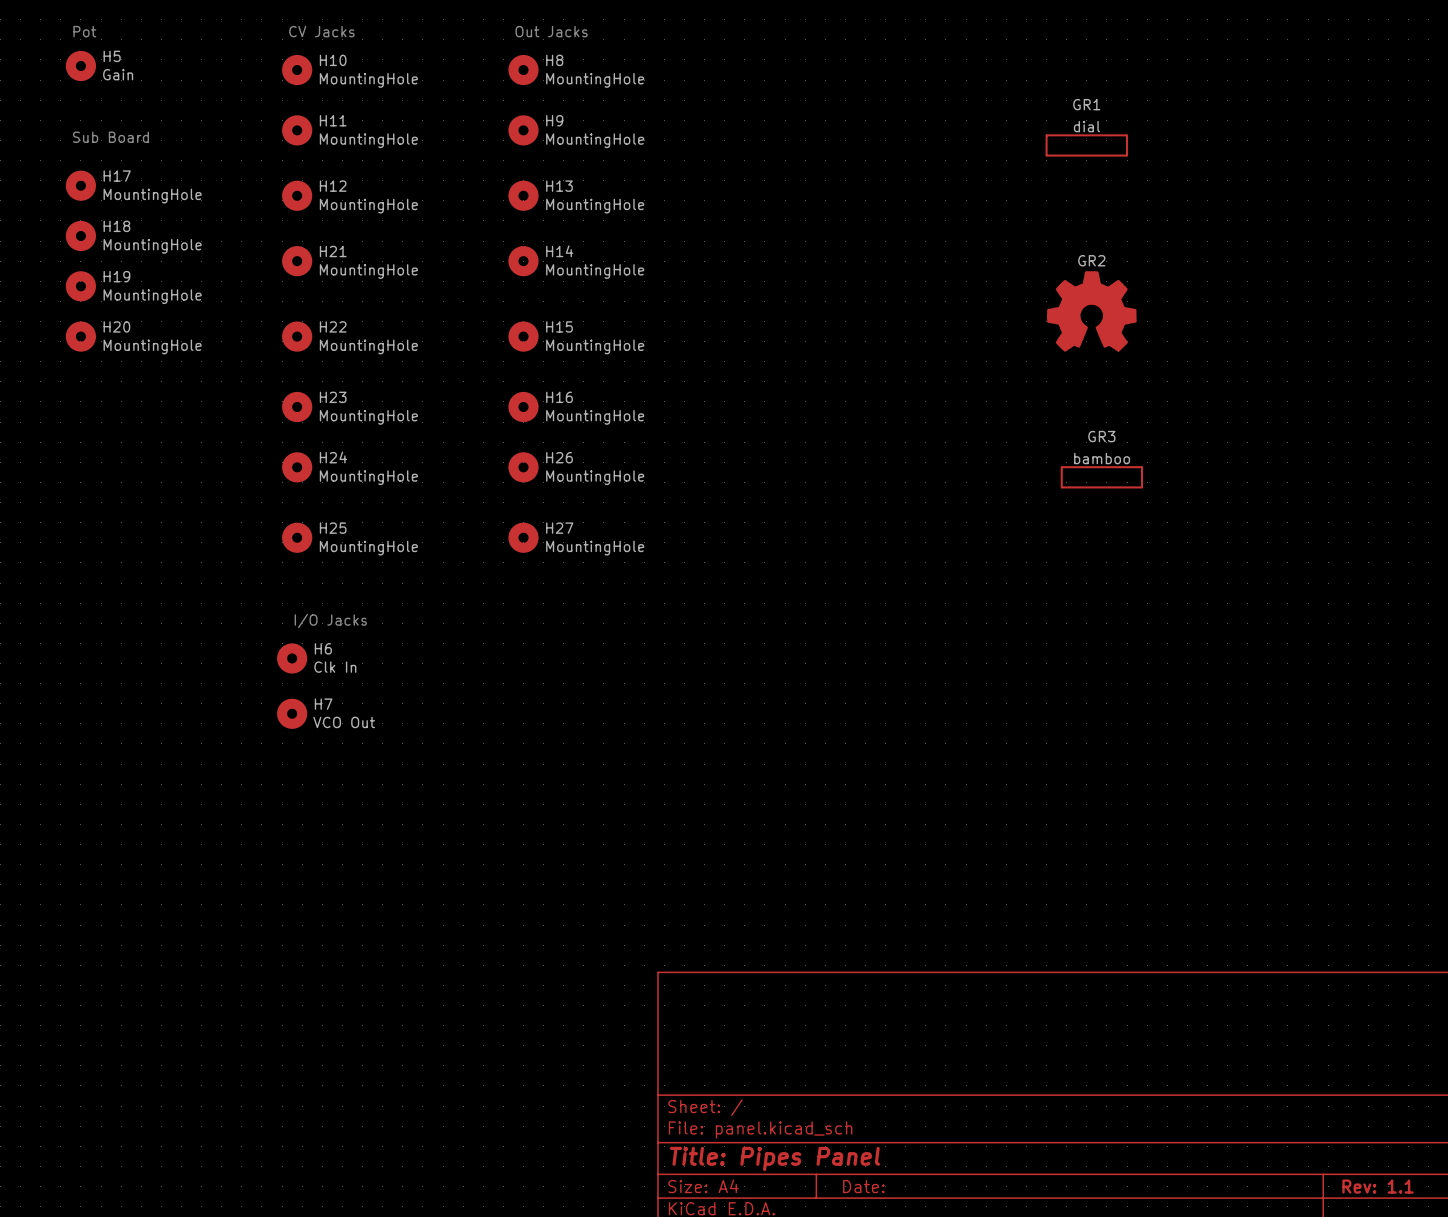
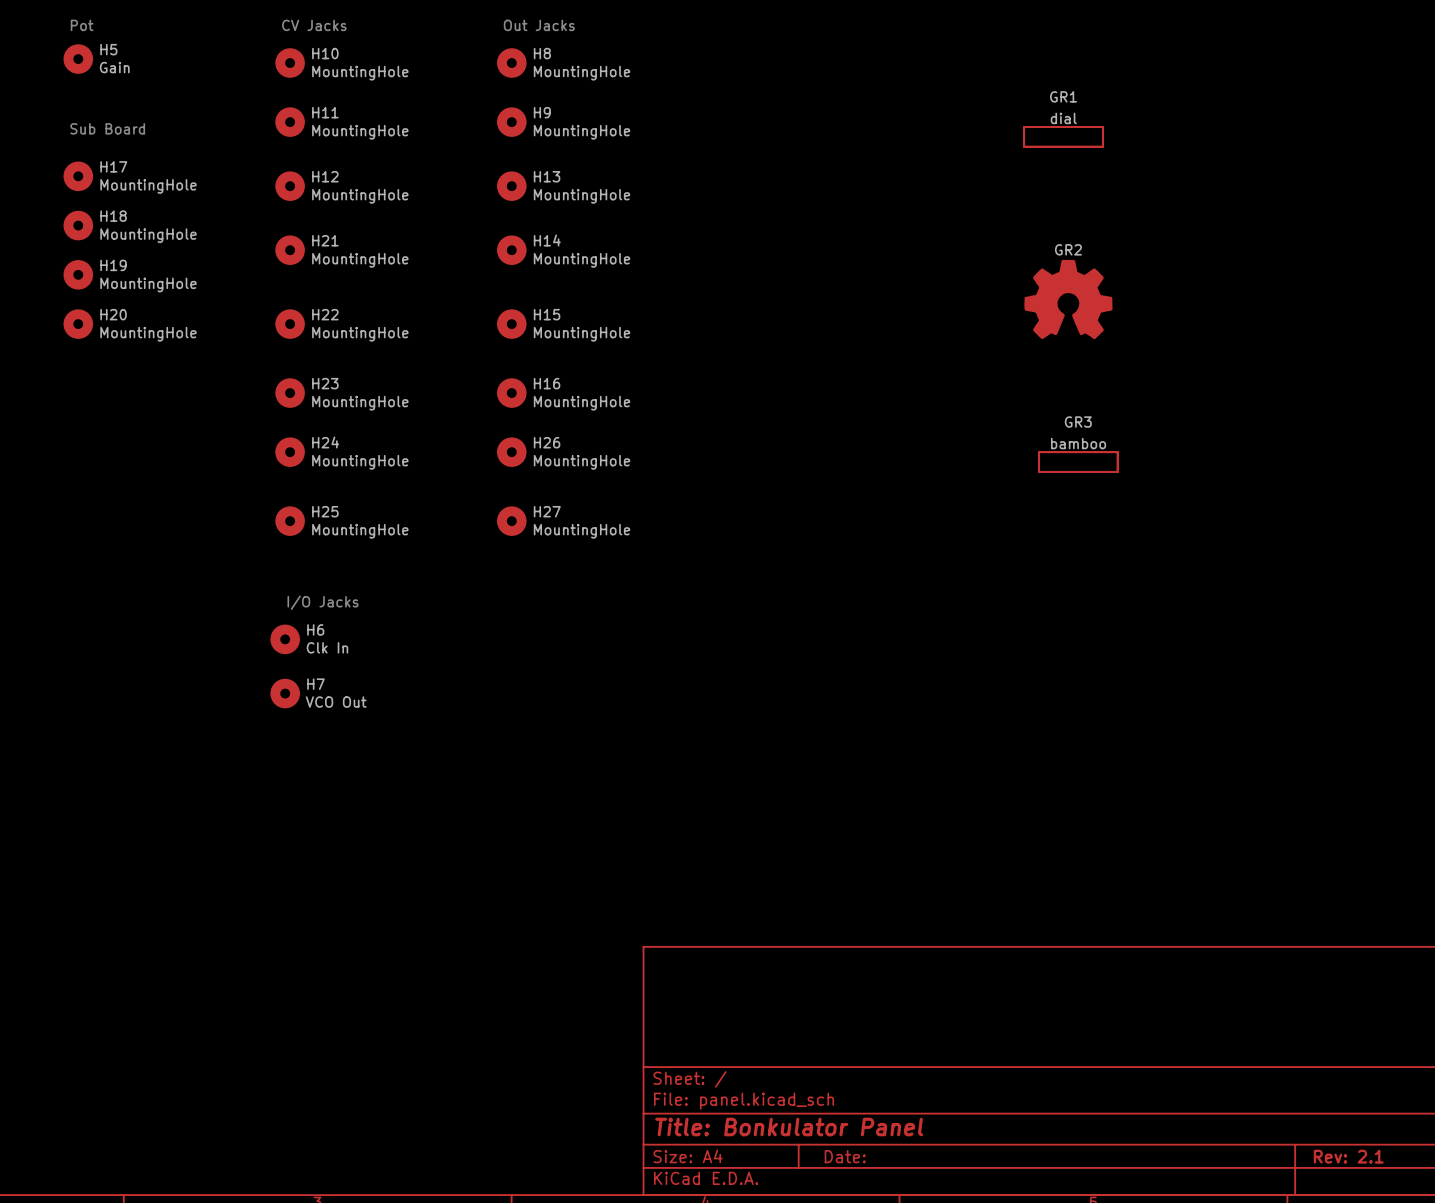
title block: Title: Pipes Panel (774, 1158) -> Title: Bonkulator Panel (789, 1127)
title block: Rev: 1.1 (1378, 1186) -> Rev: 2.1 (1348, 1156)

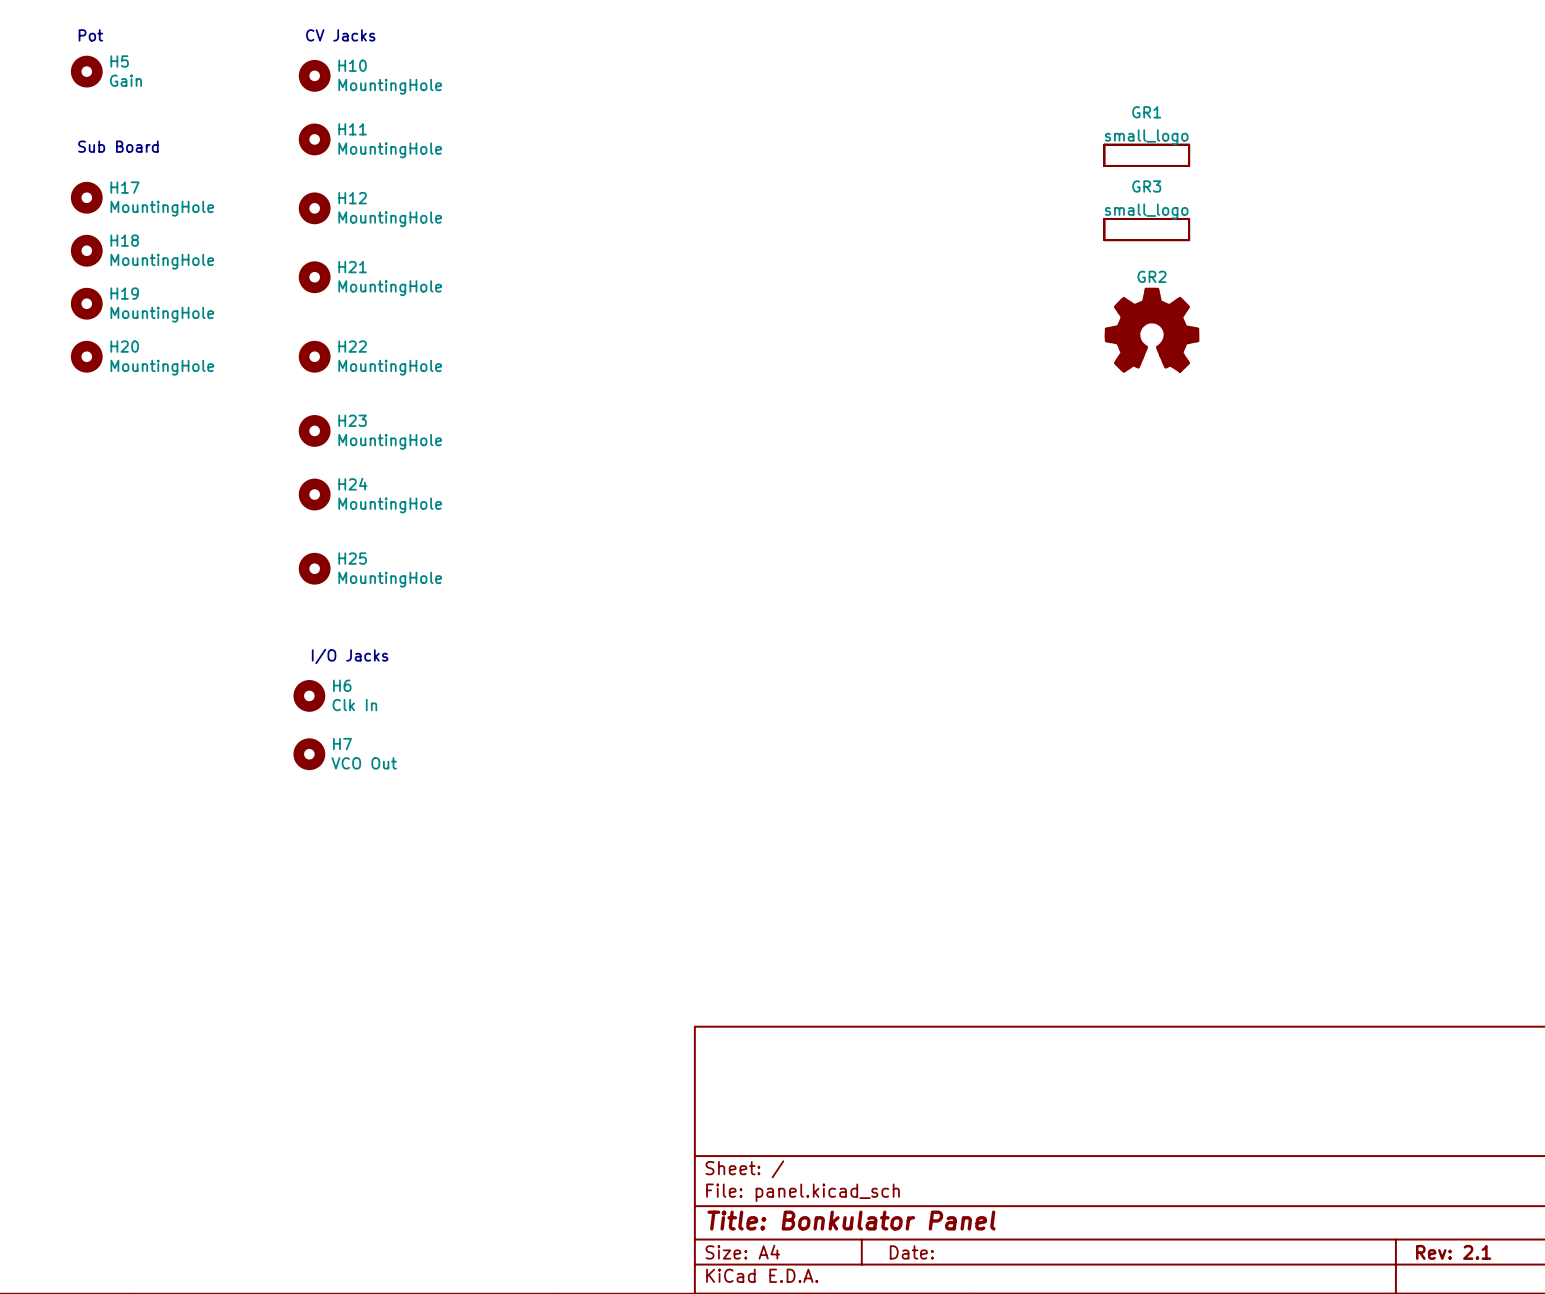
text: Out Jacks (539, 25) -> none
H8: MountingHole (511, 63) -> none
GR1 value: dial (1063, 118) -> small_logo (1146, 137)
H9: MountingHole (511, 122) -> none
H13: MountingHole (511, 186) -> none
H14: MountingHole (511, 250) -> none
H15: MountingHole (511, 324) -> none
H16: MountingHole (511, 393) -> none
GR3 value: bamboo (1078, 443) -> small_logo (1146, 211)
H26: MountingHole (511, 452) -> none
GR3 position: (1078, 462) -> (1146, 229)
H27: MountingHole (511, 521) -> none

